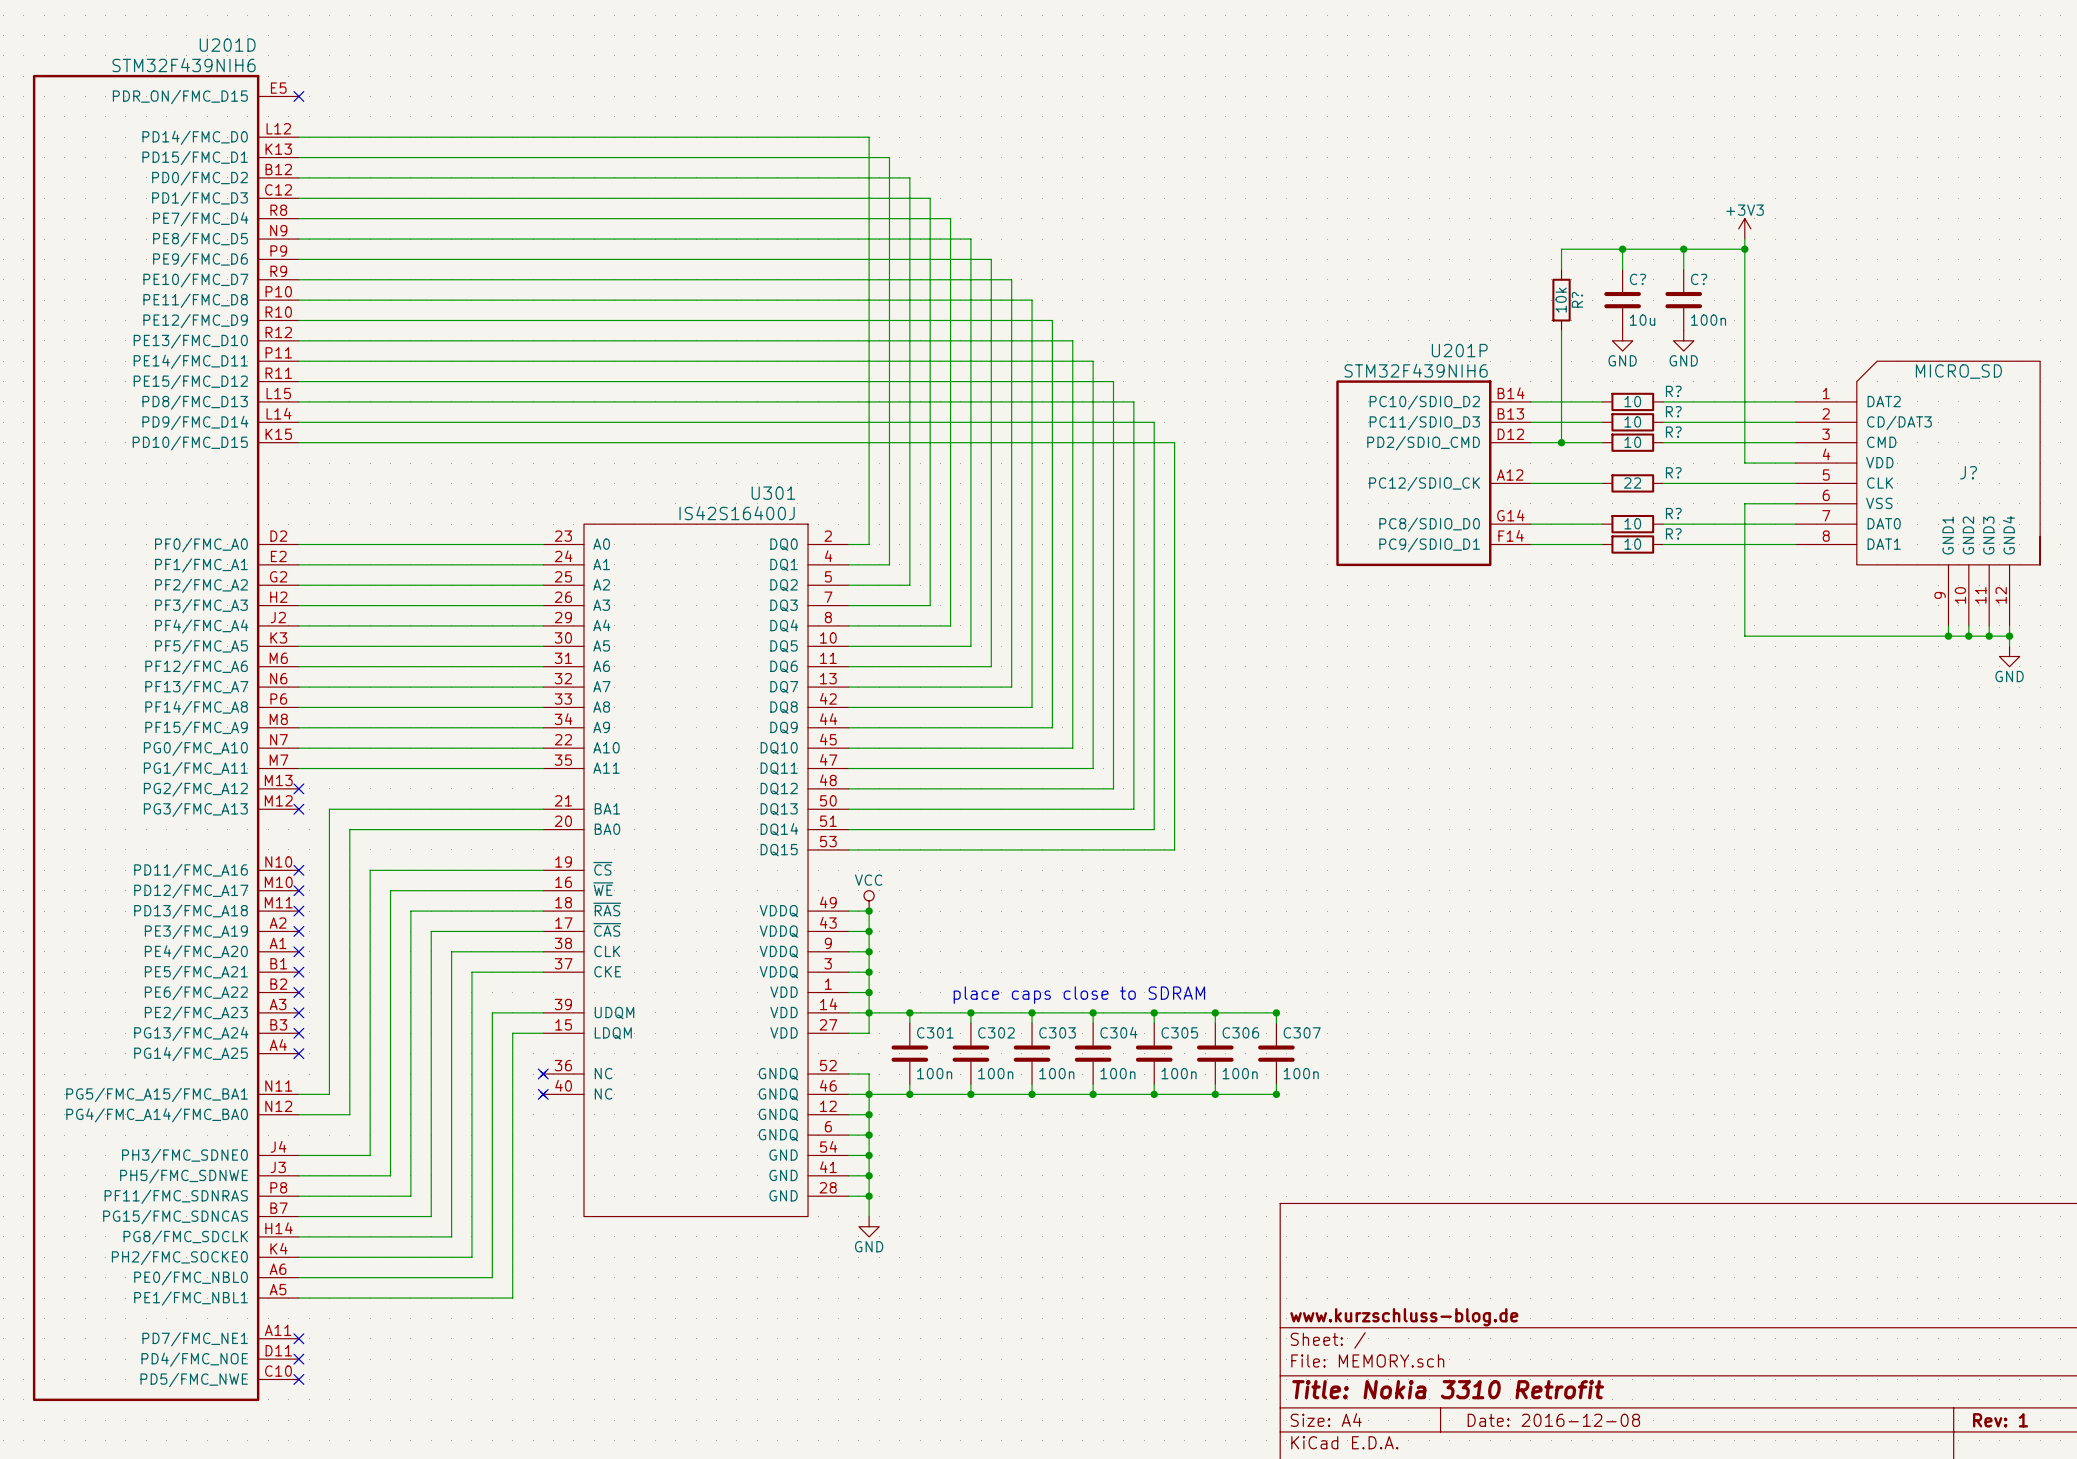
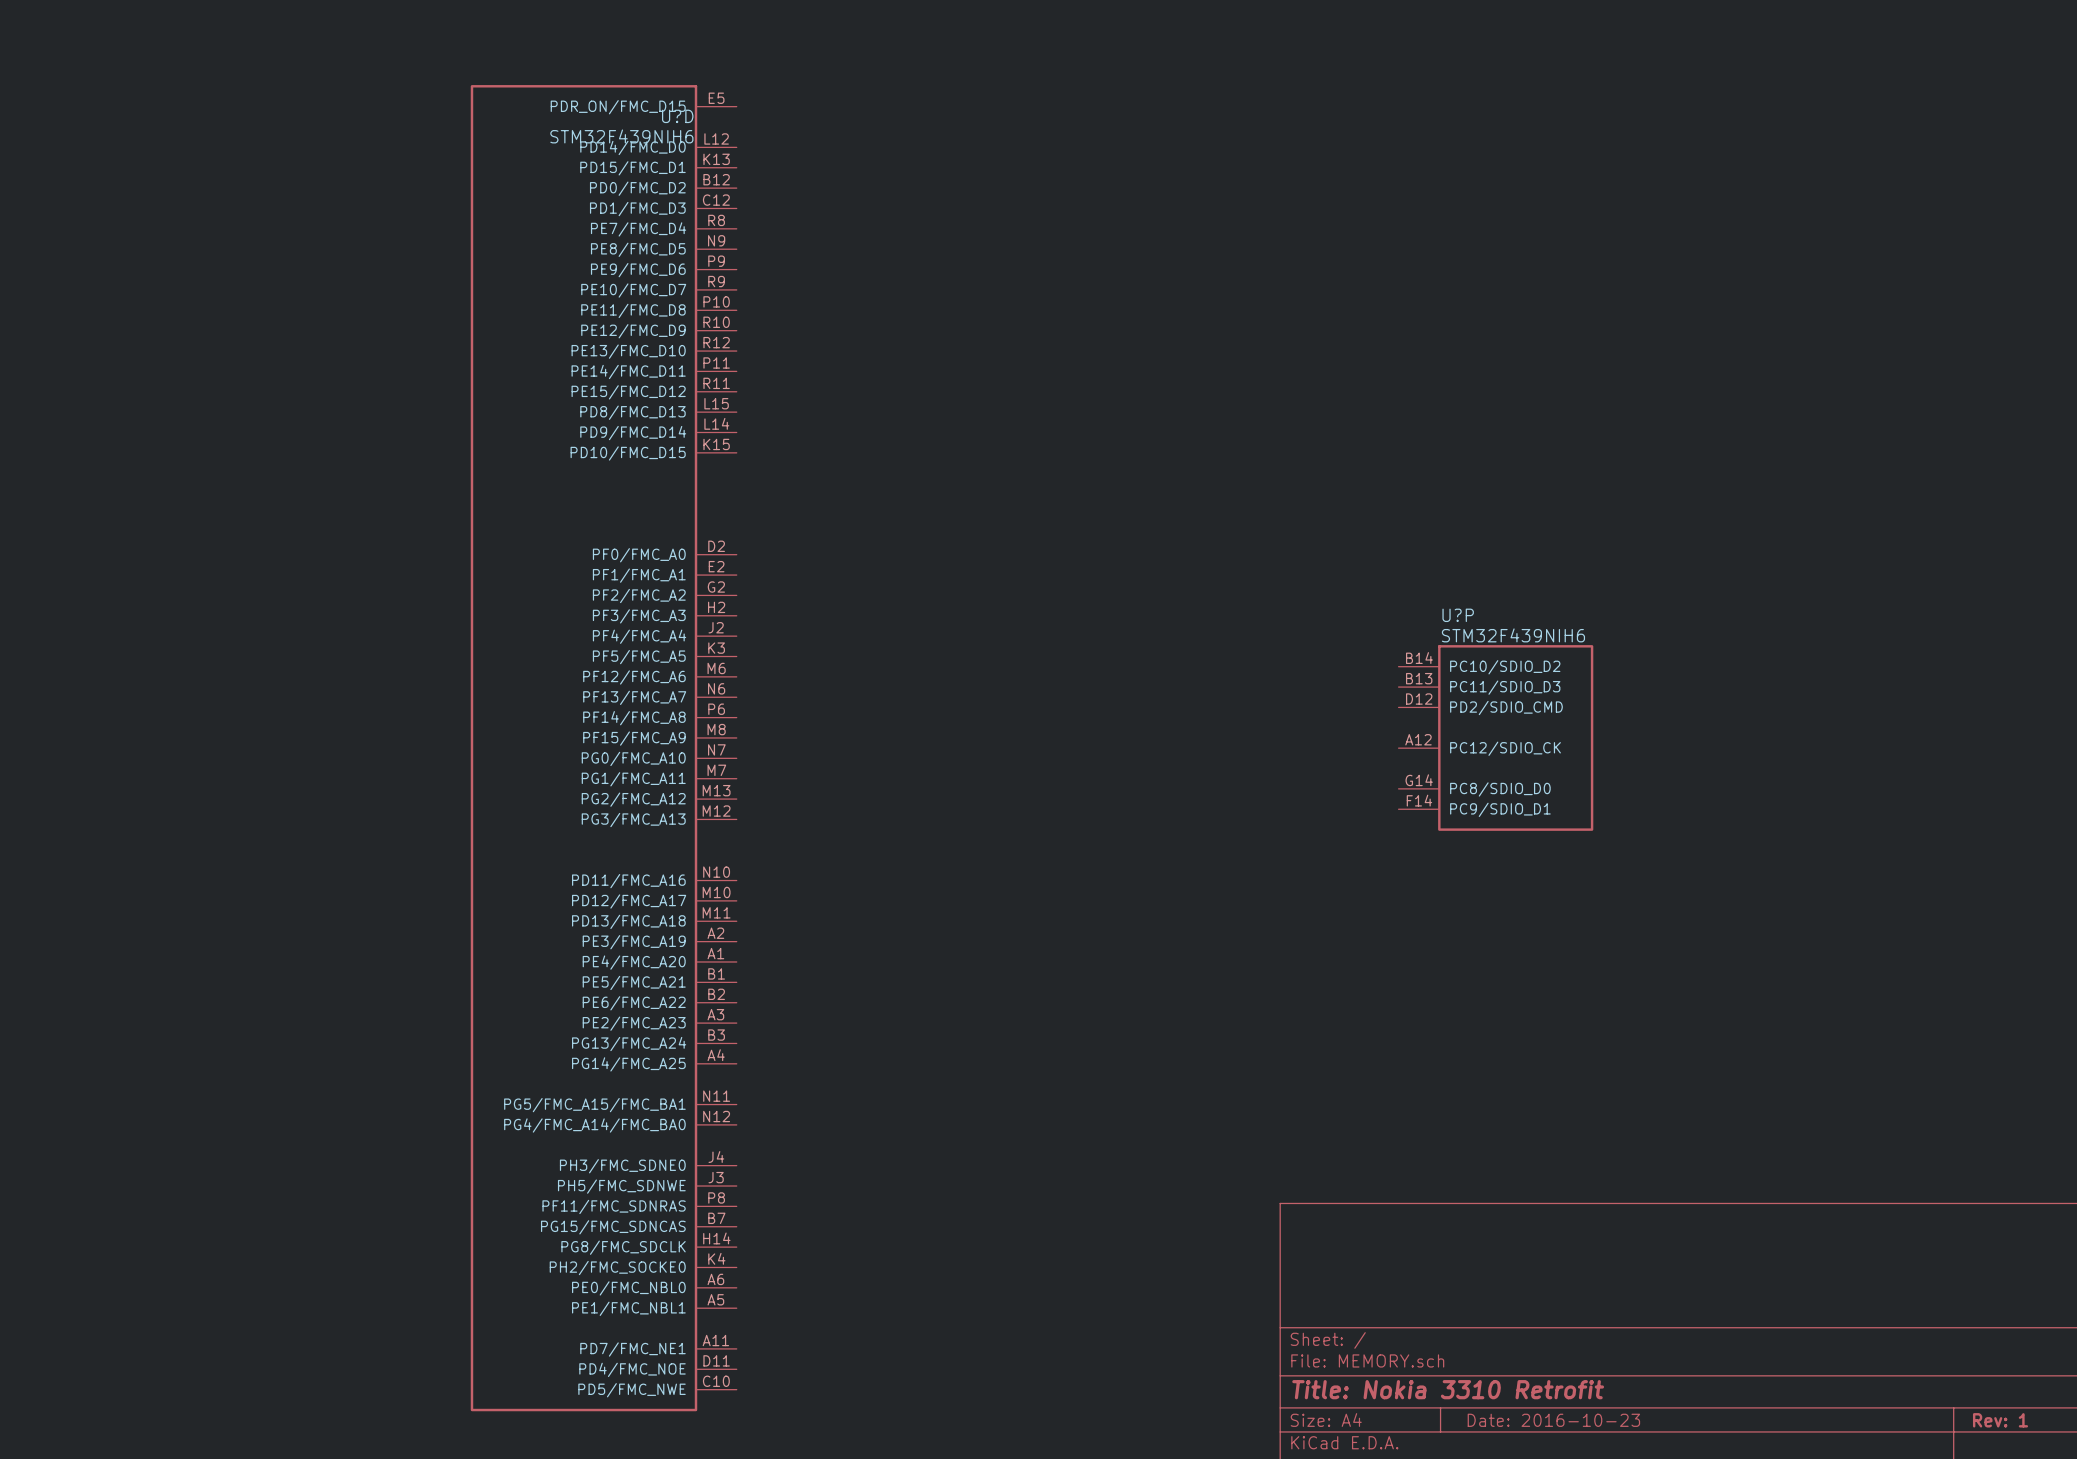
no-connect mark: (298, 96) -> none
wire: (298, 137) (869, 137) (869, 544) (848, 544) -> none
wire: (298, 157) (889, 157) (889, 564) (848, 564) -> none
wire: (298, 177) (909, 177) (909, 585) (848, 585) -> none
wire: (298, 198) (930, 198) (930, 605) (848, 605) -> none
wire: (298, 218) (950, 218) (950, 625) (848, 625) -> none
power symbol: +3V3 (1744, 228) -> none
wire: (298, 239) (970, 239) (970, 646) (848, 646) -> none
wire: (1744, 239) (1744, 463) (1795, 463) -> none
wire: (1622, 249) (1622, 269) -> none
junction: (1622, 249) -> none
wire: (1683, 249) (1683, 269) -> none
junction: (1683, 249) -> none
wire: (1744, 249) (1561, 249) (1561, 269) -> none
junction: (1744, 249) -> none
wire: (298, 259) (991, 259) (991, 666) (848, 666) -> none
wire: (298, 279) (1011, 279) (1011, 687) (848, 687) -> none
wire: (298, 300) (1032, 300) (1032, 707) (848, 707) -> none
R?: 10k (1561, 300) -> none
C?: 10u (1622, 300) -> none
C?: 100n (1683, 300) -> none
wire: (298, 320) (1052, 320) (1052, 727) (848, 727) -> none
wire: (1561, 330) (1561, 442) -> none
wire: (298, 340) (1072, 340) (1072, 748) (848, 748) -> none
power symbol: GND (1622, 340) -> none
power symbol: GND (1683, 340) -> none
wire: (298, 361) (1093, 361) (1093, 768) (848, 768) -> none
wire: (298, 381) (1113, 381) (1113, 788) (848, 788) -> none
wire: (298, 401) (1133, 401) (1133, 809) (848, 809) -> none
wire: (1530, 401) (1602, 401) -> none
R?: 10 (1632, 401) -> none
wire: (1663, 401) (1795, 401) -> none
wire: (298, 422) (1154, 422) (1154, 829) (848, 829) -> none
wire: (1530, 422) (1602, 422) -> none
R?: 10 (1632, 422) -> none
wire: (1663, 422) (1795, 422) -> none
wire: (298, 442) (1174, 442) (1174, 849) (848, 849) -> none
wire: (1530, 442) (1602, 442) -> none
junction: (1561, 442) -> none
R?: 10 (1632, 442) -> none
wire: (1663, 442) (1795, 442) -> none
U201P: STM32F439NIH6 (1433, 473) -> none
wire: (1530, 483) (1602, 483) -> none
R?: 22 (1632, 483) -> none
wire: (1663, 483) (1795, 483) -> none
J?: MICRO_SD (1917, 493) -> none
wire: (1795, 503) (1744, 503) (1744, 636) (2009, 636) -> none
wire: (1530, 524) (1602, 524) -> none
R?: 10 (1632, 524) -> none
wire: (1663, 524) (1795, 524) -> none
wire: (298, 544) (543, 544) -> none
wire: (1530, 544) (1602, 544) -> none
R?: 10 (1632, 544) -> none
wire: (1663, 544) (1795, 544) -> none
wire: (298, 564) (543, 564) -> none
wire: (298, 585) (543, 585) -> none
wire: (298, 605) (543, 605) -> none
wire: (298, 625) (543, 625) -> none
wire: (1948, 625) (1948, 636) -> none
wire: (1968, 625) (1968, 636) -> none
wire: (1989, 625) (1989, 636) -> none
wire: (2009, 625) (2009, 646) -> none
junction: (1948, 636) -> none
junction: (1968, 636) -> none
junction: (1989, 636) -> none
junction: (2009, 636) -> none
wire: (298, 646) (543, 646) -> none
power symbol: GND (2009, 656) -> none
wire: (298, 666) (543, 666) -> none
wire: (298, 687) (543, 687) -> none
wire: (298, 707) (543, 707) -> none
wire: (298, 727) (543, 727) -> none
U201D: STM32F439NIH6 (165, 737) -> none
U?P: none -> STM32F439NIH6 (1495, 737)
wire: (298, 748) (543, 748) -> none
U?D: none -> STM32F439NIH6 (603, 748)
wire: (298, 768) (543, 768) -> none
no-connect mark: (298, 788) -> none
no-connect mark: (298, 809) -> none
wire: (543, 809) (329, 809) (329, 1094) (298, 1094) -> none
wire: (543, 829) (349, 829) (349, 1114) (298, 1114) -> none
no-connect mark: (298, 870) -> none
wire: (543, 870) (370, 870) (370, 1155) (298, 1155) -> none
U301: IS42S16400J (694, 870) -> none
no-connect mark: (298, 890) -> none
wire: (543, 890) (390, 890) (390, 1175) (298, 1175) -> none
power symbol: VCC (869, 900) -> none
no-connect mark: (298, 911) -> none
wire: (543, 911) (410, 911) (410, 1196) (298, 1196) -> none
wire: (848, 911) (869, 911) (869, 1033) (848, 1033) -> none
junction: (869, 911) -> none
no-connect mark: (298, 931) -> none
wire: (543, 931) (431, 931) (431, 1216) (298, 1216) -> none
wire: (848, 931) (869, 931) -> none
junction: (869, 931) -> none
no-connect mark: (298, 951) -> none
wire: (543, 951) (451, 951) (451, 1236) (298, 1236) -> none
wire: (848, 951) (869, 951) -> none
junction: (869, 951) -> none
no-connect mark: (298, 972) -> none
wire: (543, 972) (471, 972) (471, 1257) (298, 1257) -> none
wire: (848, 972) (869, 972) -> none
junction: (869, 972) -> none
no-connect mark: (298, 992) -> none
wire: (848, 992) (869, 992) -> none
junction: (869, 992) -> none
text: place caps close to SDRAM (1079, 995) -> none
no-connect mark: (298, 1012) -> none
wire: (543, 1012) (492, 1012) (492, 1277) (298, 1277) -> none
wire: (848, 1012) (1276, 1012) (1276, 1023) -> none
junction: (869, 1012) -> none
wire: (909, 1012) (909, 1023) -> none
junction: (909, 1012) -> none
wire: (970, 1012) (970, 1023) -> none
junction: (970, 1012) -> none
wire: (1032, 1012) (1032, 1023) -> none
junction: (1032, 1012) -> none
wire: (1093, 1012) (1093, 1023) -> none
junction: (1093, 1012) -> none
wire: (1154, 1012) (1154, 1023) -> none
junction: (1154, 1012) -> none
wire: (1215, 1012) (1215, 1023) -> none
junction: (1215, 1012) -> none
junction: (1276, 1012) -> none
no-connect mark: (298, 1033) -> none
wire: (543, 1033) (512, 1033) (512, 1298) (298, 1298) -> none
no-connect mark: (298, 1053) -> none
C301: 100n (909, 1053) -> none
C302: 100n (970, 1053) -> none
C303: 100n (1032, 1053) -> none
C304: 100n (1093, 1053) -> none
C305: 100n (1154, 1053) -> none
C306: 100n (1215, 1053) -> none
C307: 100n (1276, 1053) -> none
no-connect mark: (543, 1074) -> none
wire: (848, 1074) (869, 1074) (869, 1216) -> none
wire: (909, 1084) (909, 1094) -> none
wire: (970, 1084) (970, 1094) -> none
wire: (1032, 1084) (1032, 1094) -> none
wire: (1093, 1084) (1093, 1094) -> none
wire: (1154, 1084) (1154, 1094) -> none
wire: (1215, 1084) (1215, 1094) -> none
wire: (1276, 1084) (1276, 1094) (848, 1094) -> none
no-connect mark: (543, 1094) -> none
junction: (869, 1094) -> none
junction: (909, 1094) -> none
junction: (970, 1094) -> none
junction: (1032, 1094) -> none
junction: (1093, 1094) -> none
junction: (1154, 1094) -> none
junction: (1215, 1094) -> none
junction: (1276, 1094) -> none
wire: (848, 1114) (869, 1114) -> none
junction: (869, 1114) -> none
wire: (848, 1135) (869, 1135) -> none
junction: (869, 1135) -> none
wire: (848, 1155) (869, 1155) -> none
junction: (869, 1155) -> none
wire: (848, 1175) (869, 1175) -> none
junction: (869, 1175) -> none
wire: (848, 1196) (869, 1196) -> none
junction: (869, 1196) -> none
power symbol: GND (869, 1226) -> none
title block: www.kurzschluss-blog.de (1404, 1317) -> none
no-connect mark: (298, 1338) -> none
no-connect mark: (298, 1359) -> none
no-connect mark: (298, 1379) -> none
title block: Date: 2016-12-08 (1553, 1420) -> Date: 2016-10-23 (1553, 1420)

